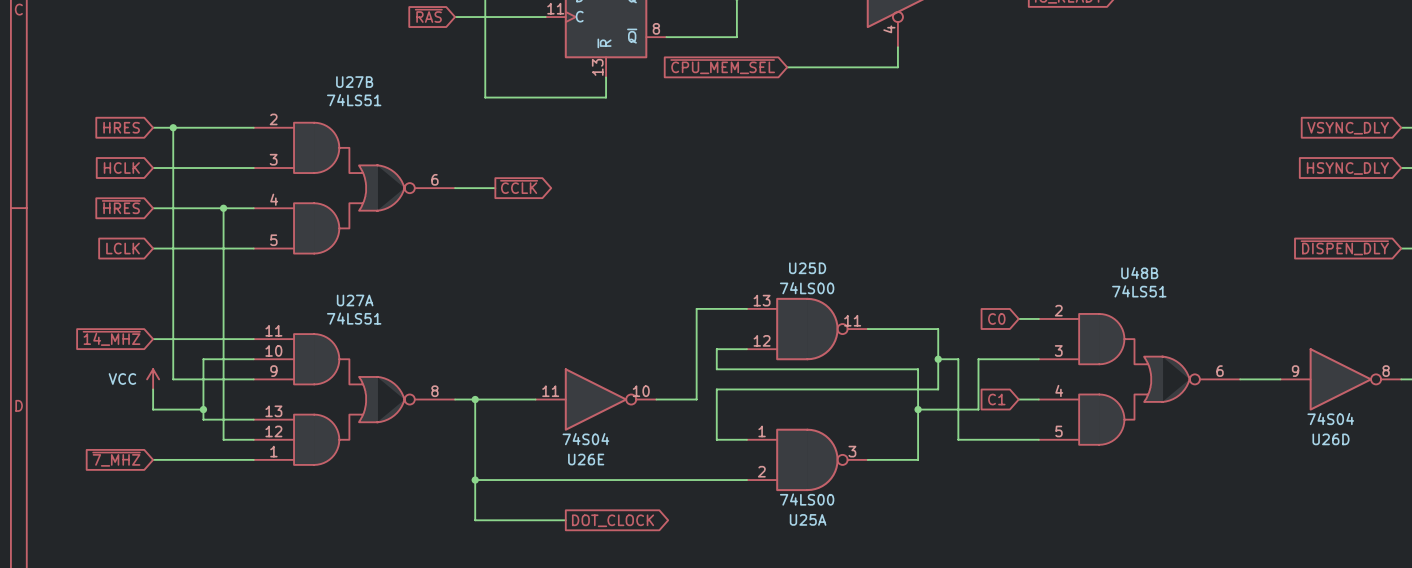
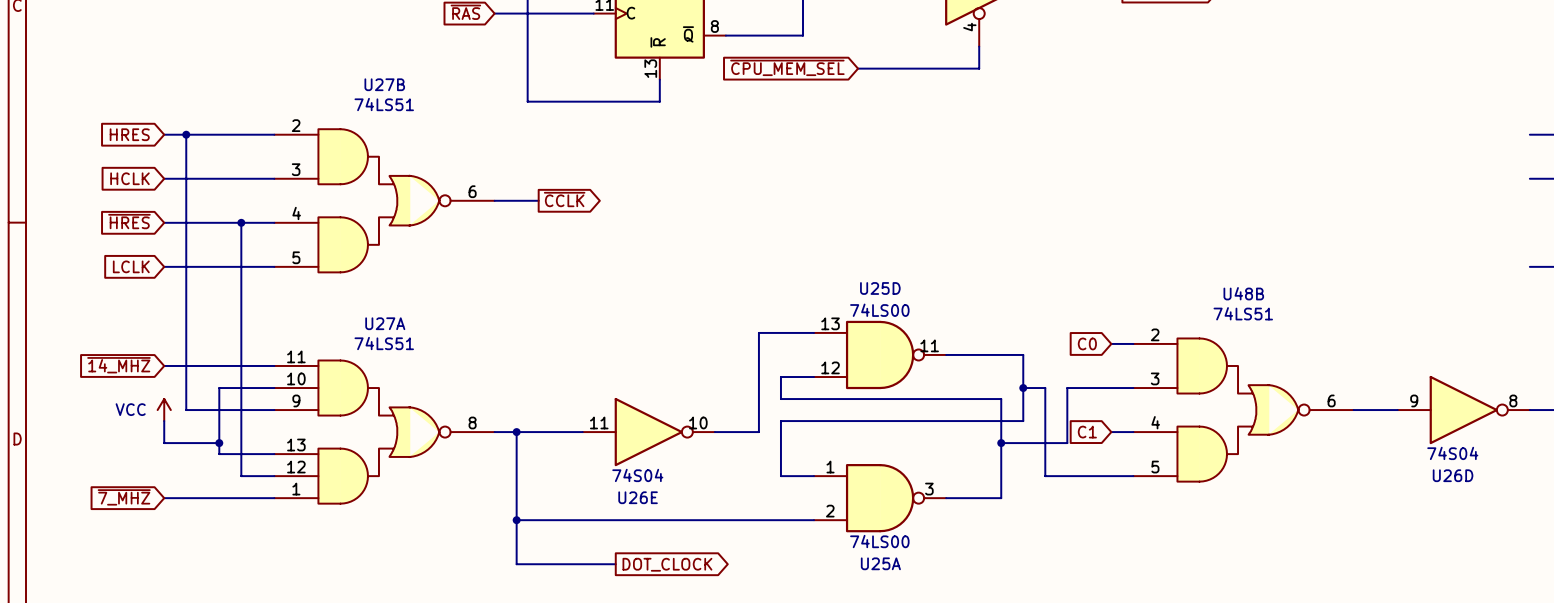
global label: VSYNC_DLY (1348, 128) -> none
global label: HSYNC_DLY (1347, 168) -> none
global label: ~{DISPEN_DLY} (1344, 247) -> none

